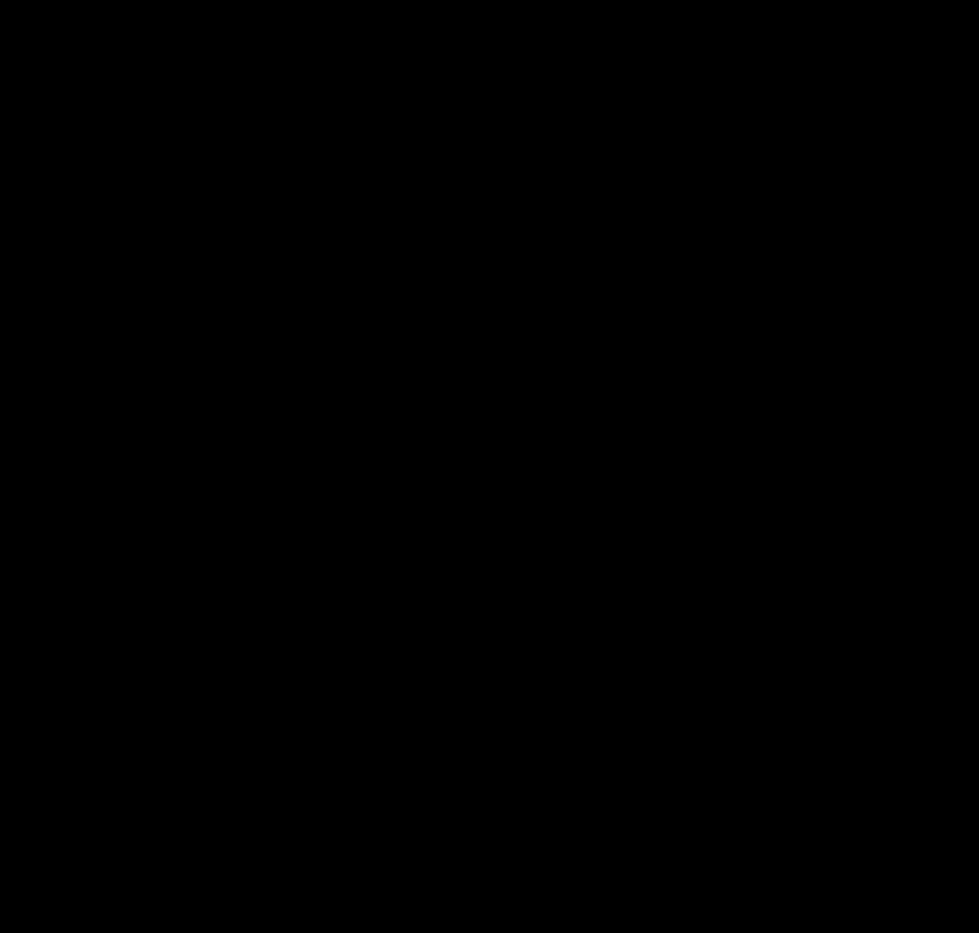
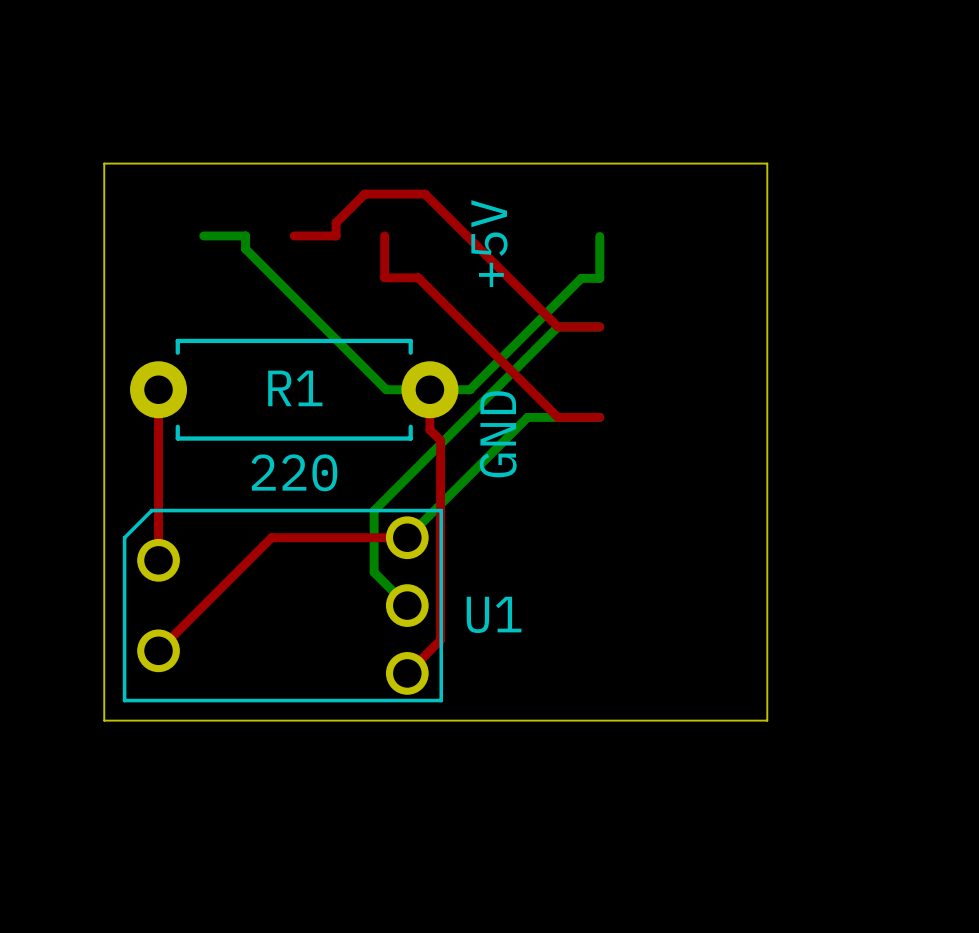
board edge: none -> (104, 163) (767, 163) (767, 720) (104, 720) (104, 163)
bottom track: none -> (203, 235) (245, 235) (245, 249) (386, 389) (470, 389) (581, 278) (599, 278) (599, 236)
top track: none -> (294, 235) (336, 235) (336, 222) (364, 194) (425, 194) (557, 326) (599, 326)
top track: none -> (384, 235) (384, 277) (418, 277) (557, 417) (599, 417)
text: none -> +5V (489, 243)
bottom track: none -> (599, 326) (557, 326) (374, 510) (374, 572) (407, 605)
top track: none -> (158, 389) (158, 560)
R1: none -> 220 (294, 389)
top track: none -> (429, 389) (429, 429) (440, 440) (440, 640) (407, 673)
bottom track: none -> (599, 417) (527, 417) (407, 537)
text: none -> GND (498, 434)
top track: none -> (407, 537) (271, 537) (158, 650)
U1: none -> (282, 605)

